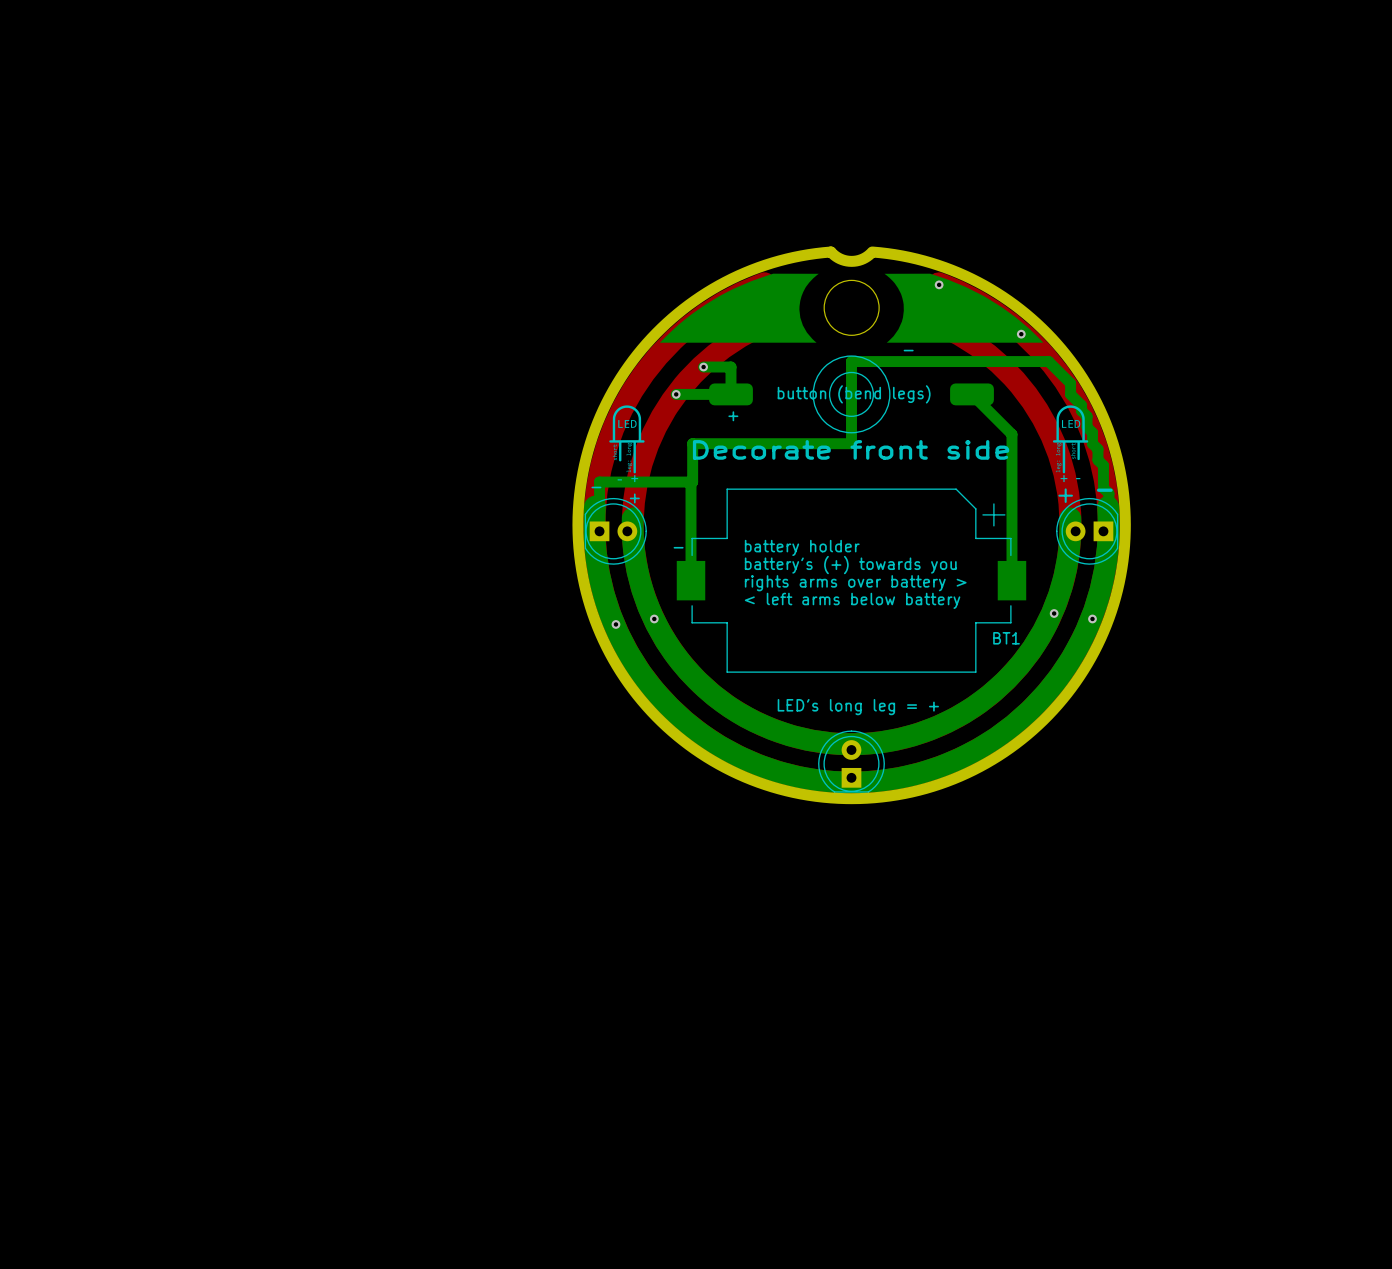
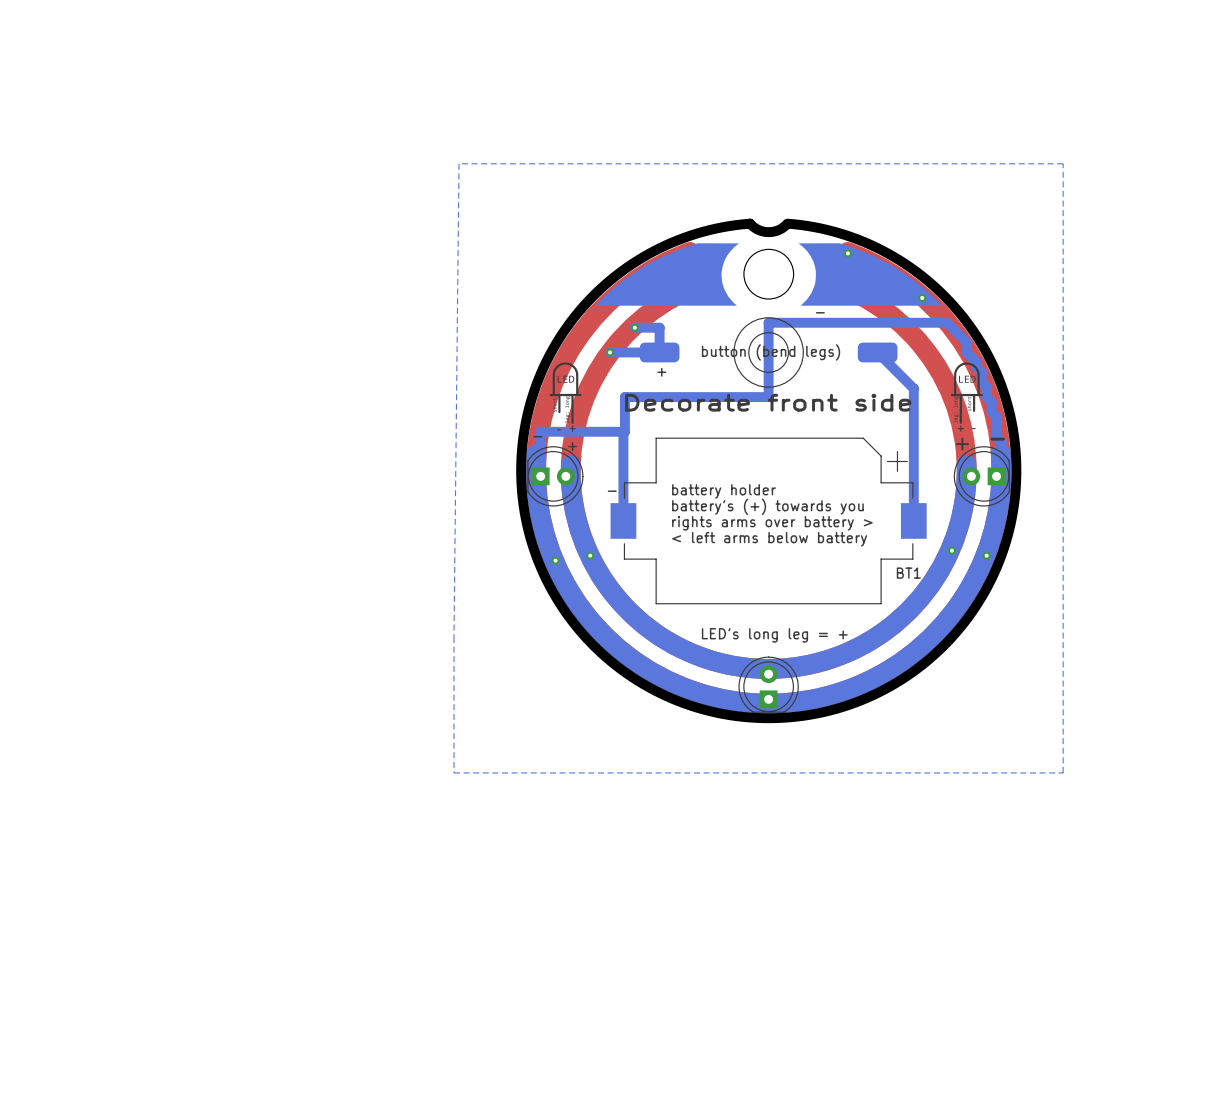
bottom zone outline: none -> (1063, 163) (1063, 772) (453, 772) (459, 163) (1063, 163)

